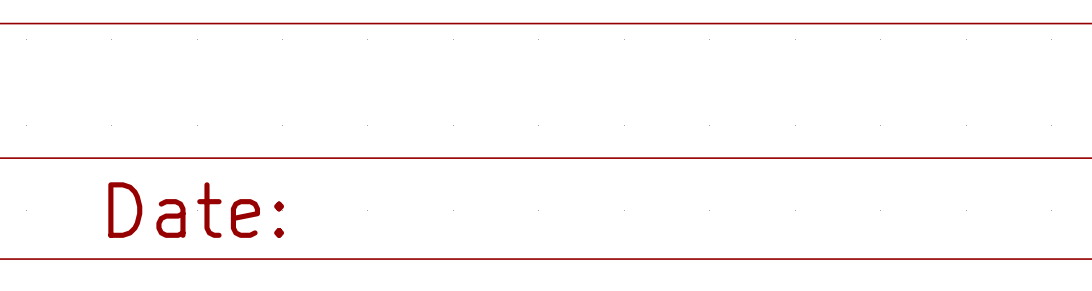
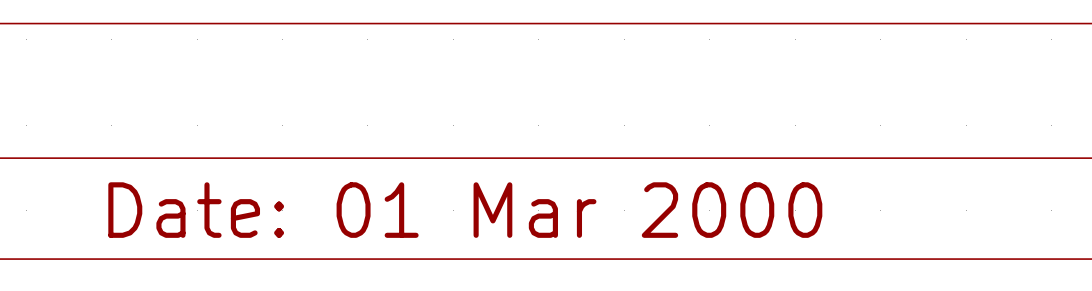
title block: Date: (196, 210) -> Date: 01 Mar 2000 (465, 210)

